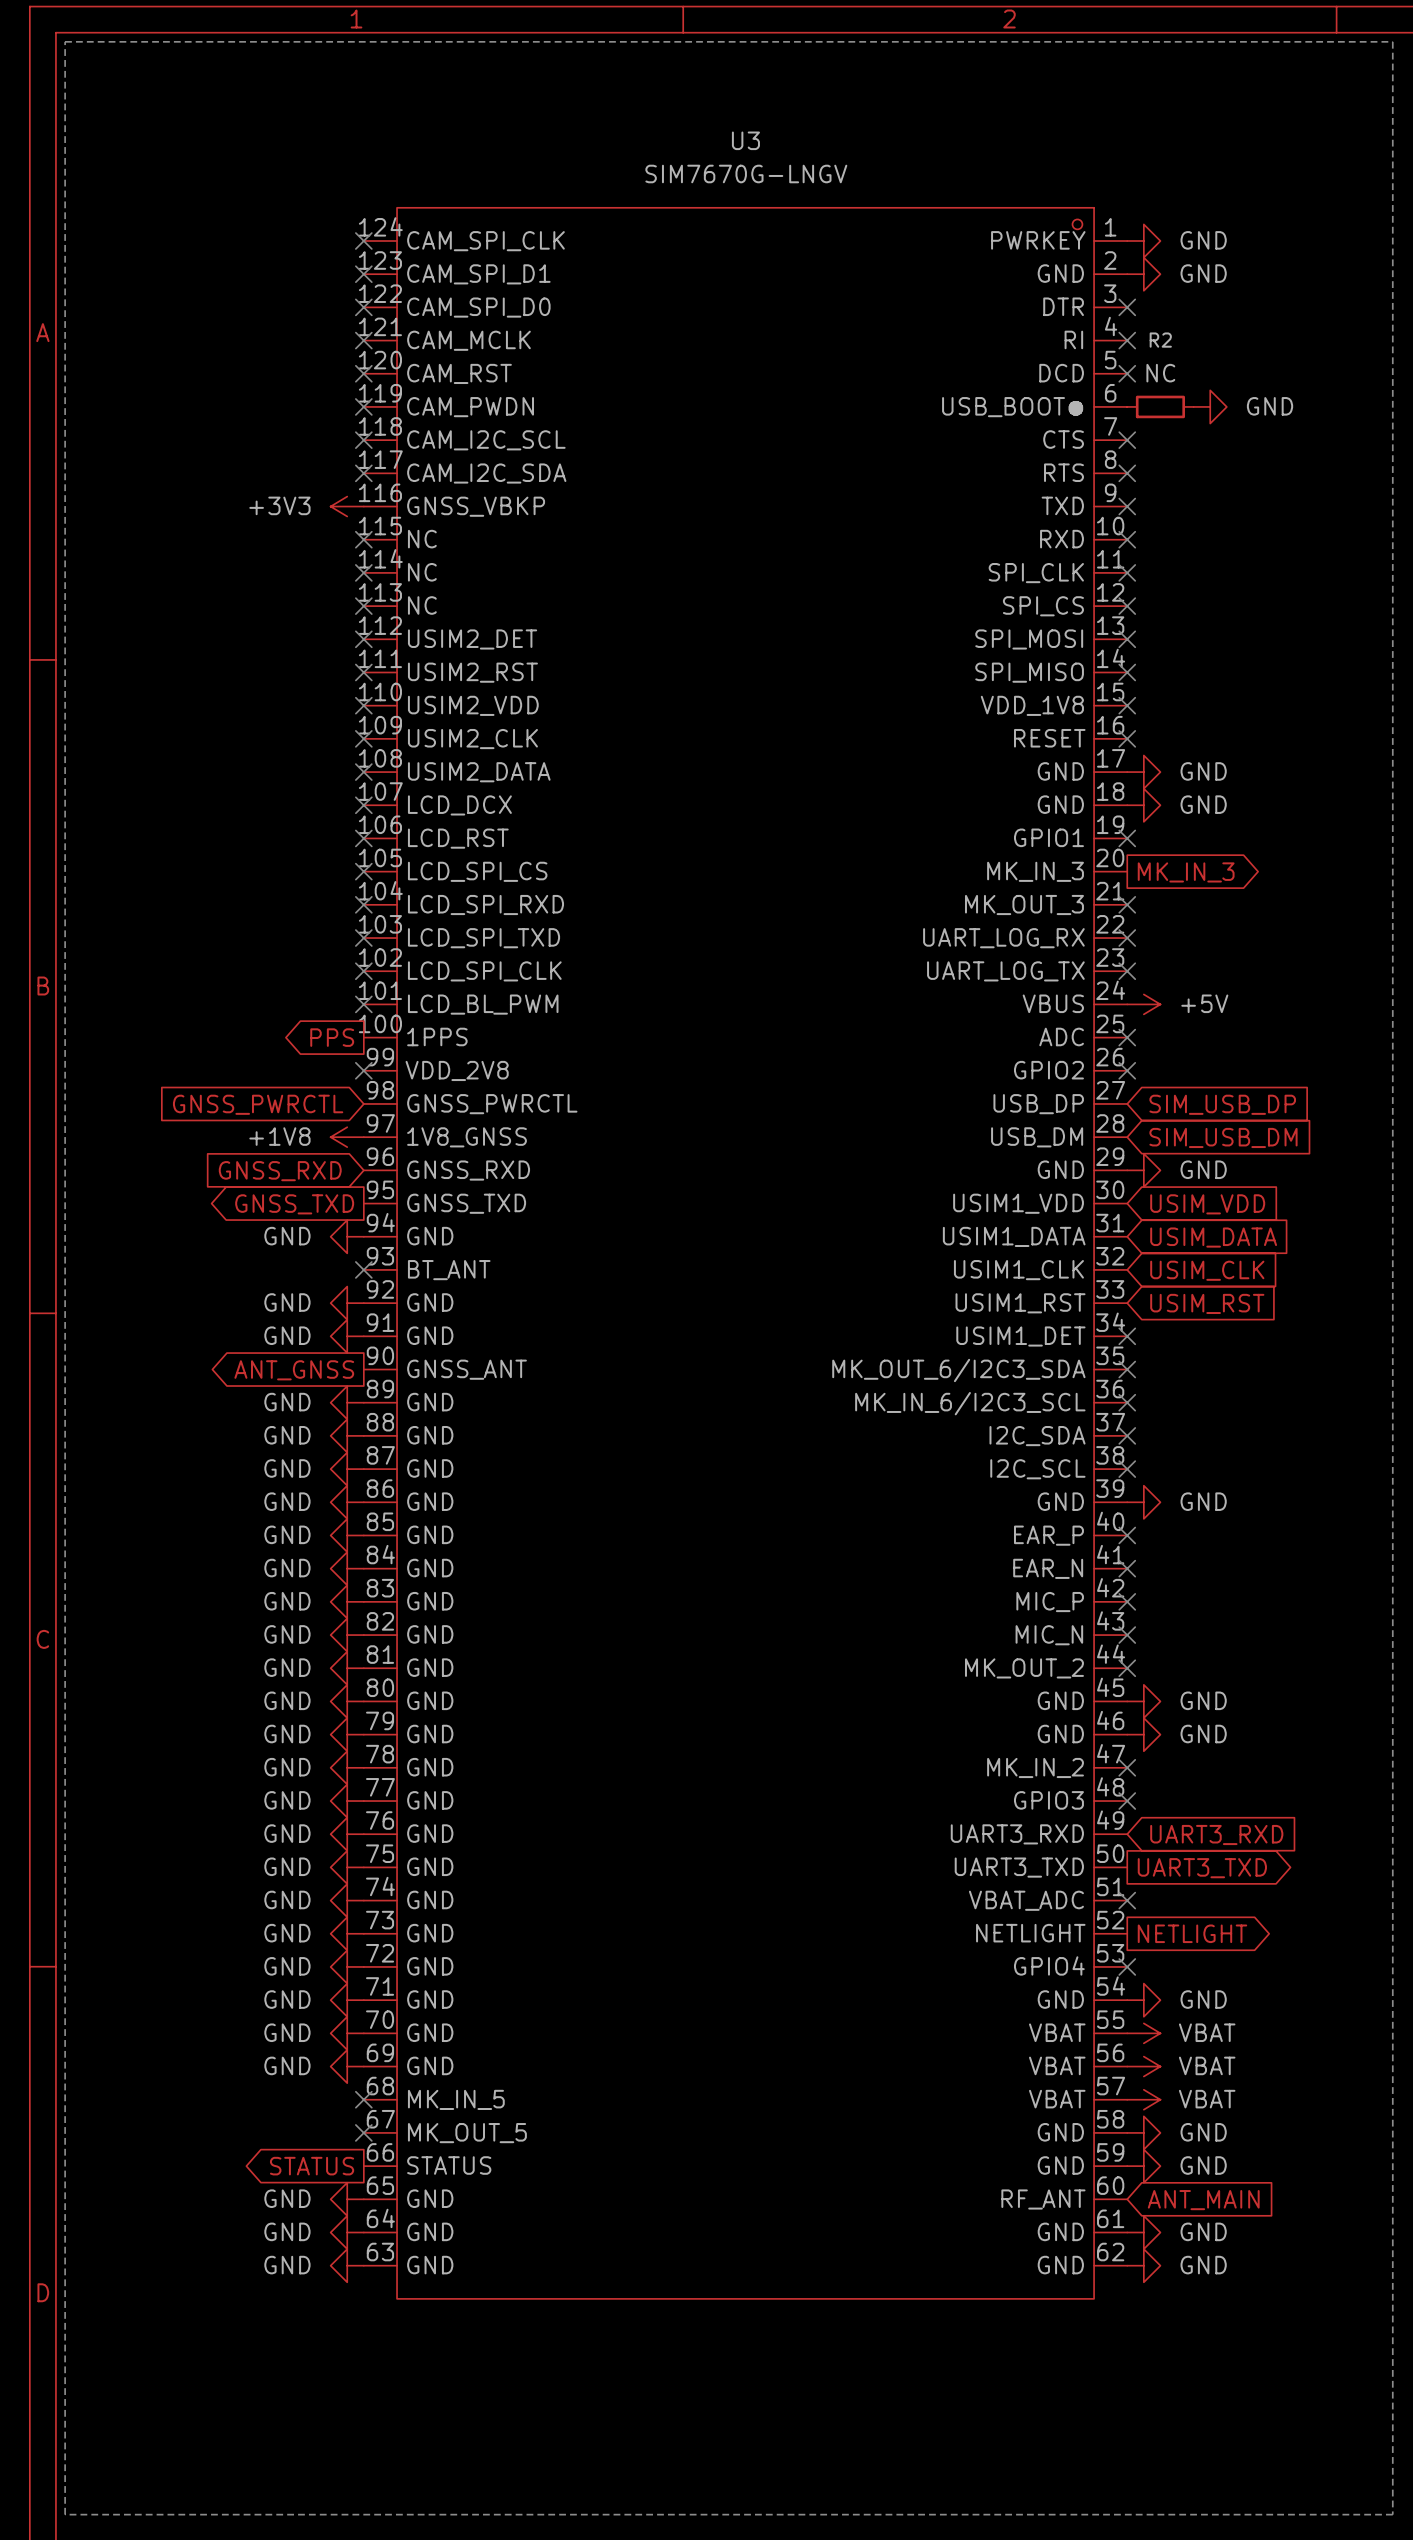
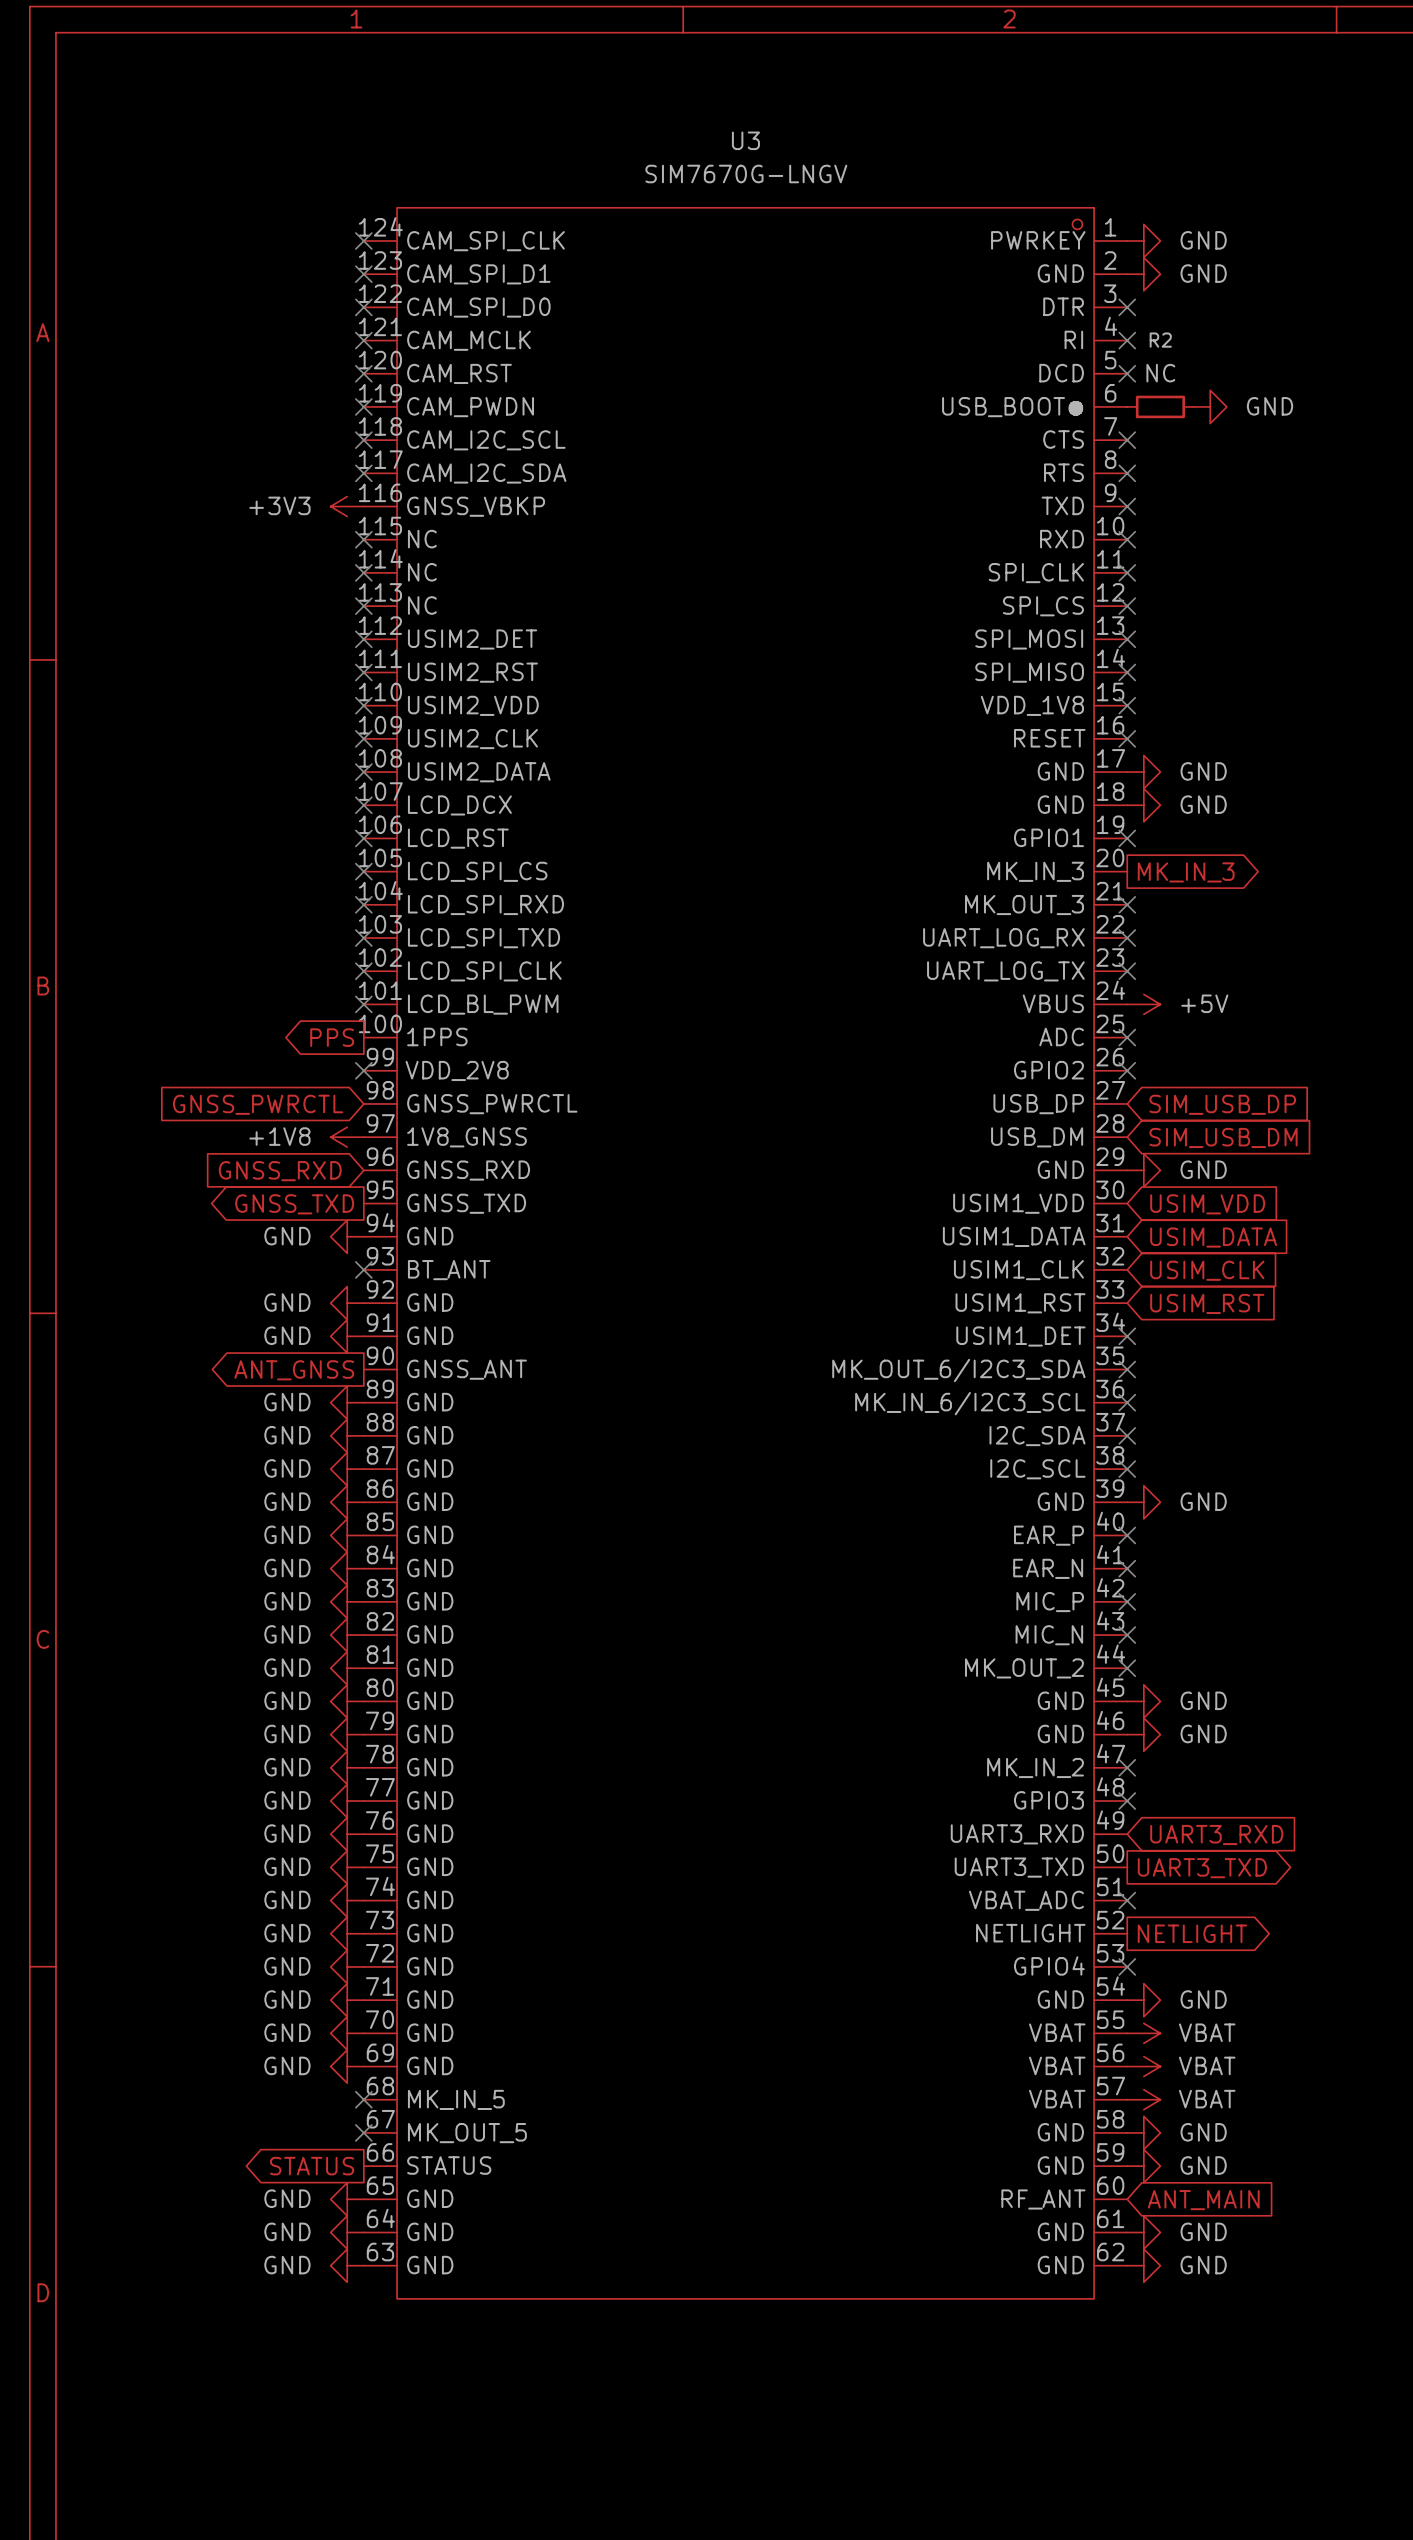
line: (65, 41) (1392, 41) (1392, 2514) (65, 2514) (65, 41) -> none

